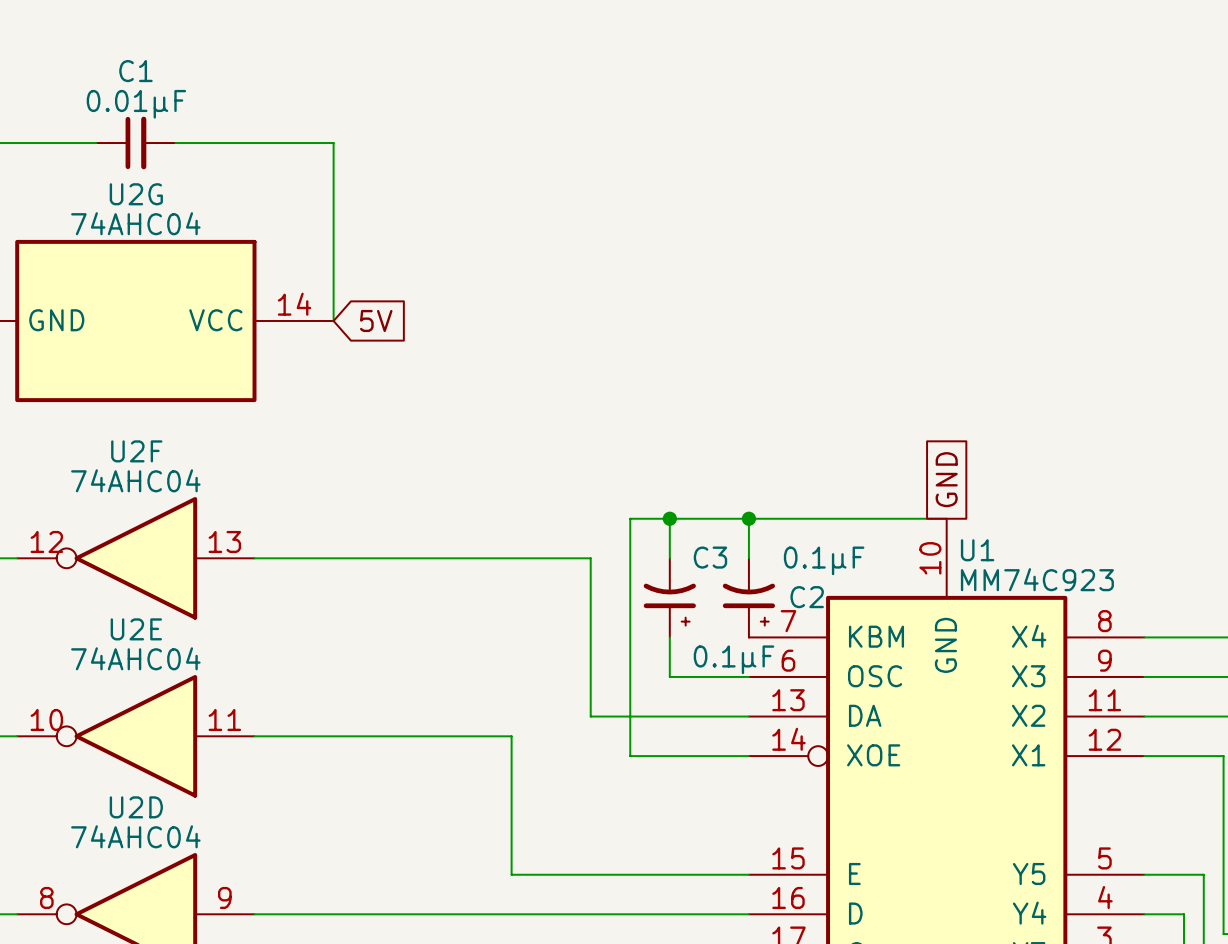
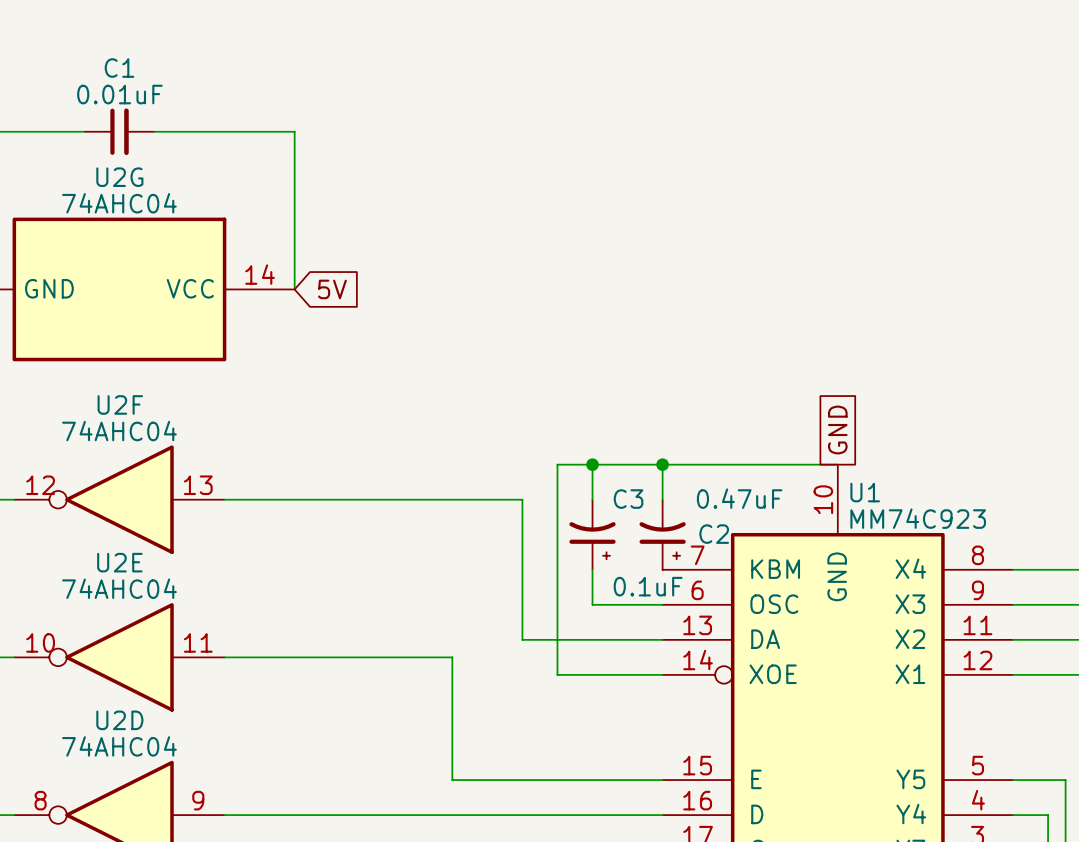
C1 value: 0.01µF (136, 104) -> 0.01uF (119, 94)
C2 value: 0.1µF (824, 560) -> 0.47uF (739, 498)
C3 value: 0.1µF (734, 659) -> 0.1uF (648, 586)

